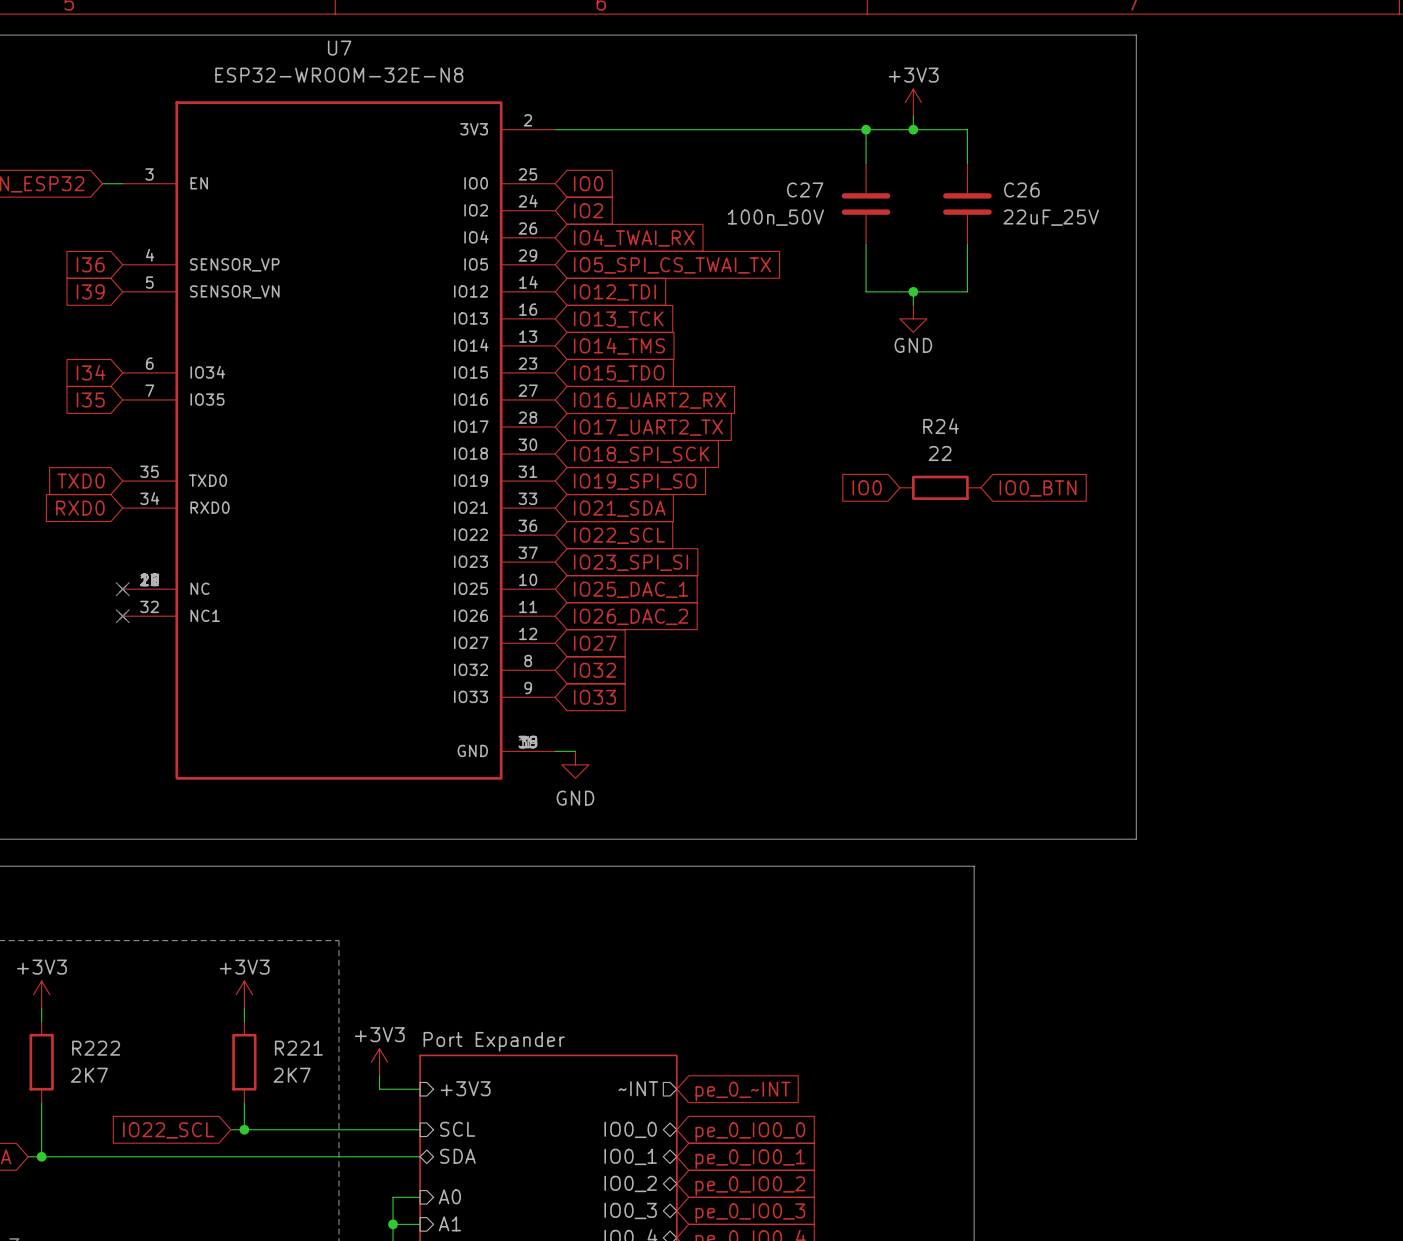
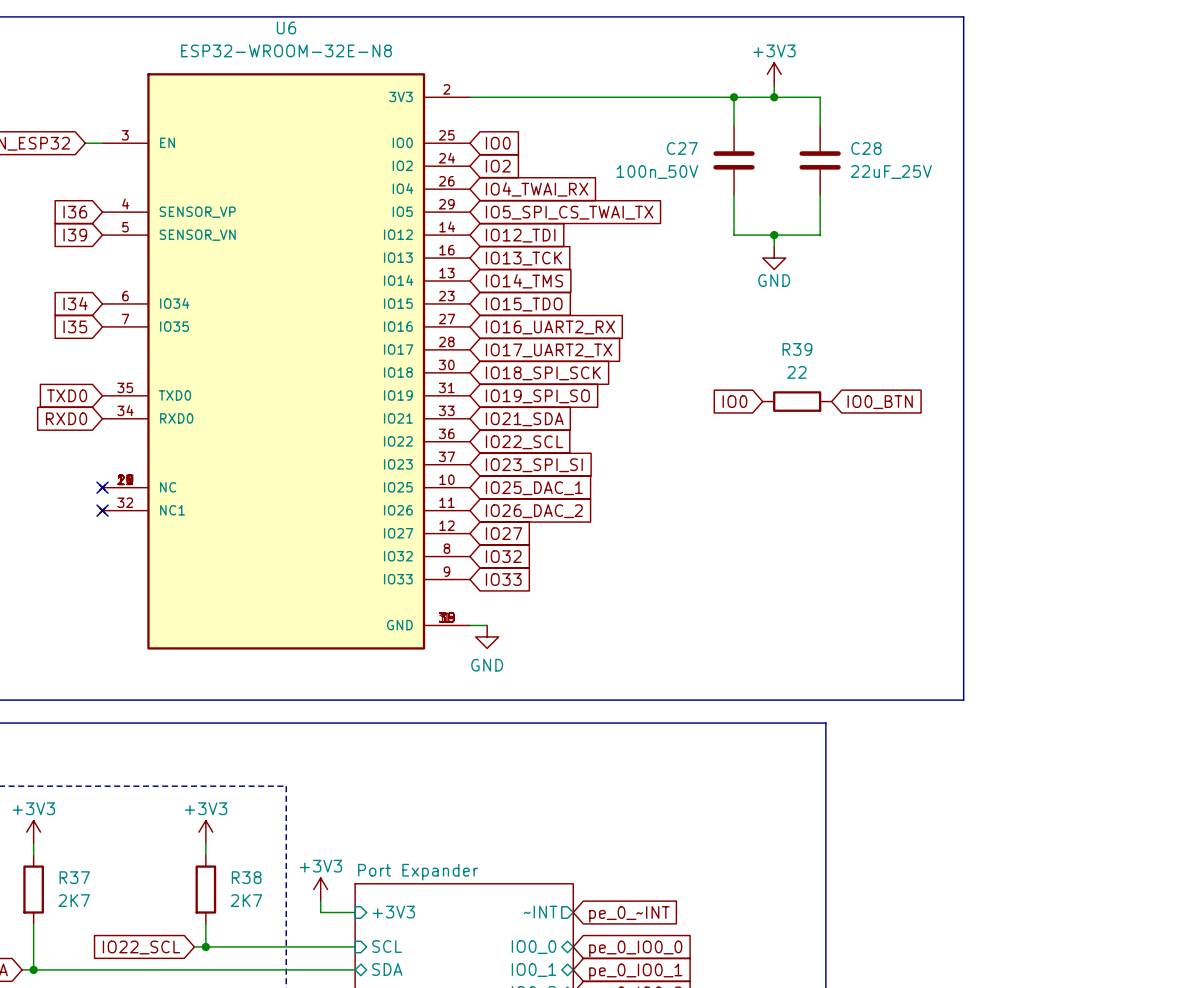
U7 name: U7 (339, 48) -> U6 (286, 27)
C26 name: C26 (1021, 189) -> C28 (866, 148)
R24 name: R24 (941, 426) -> R39 (797, 349)
R222 name: R222 (96, 1048) -> R37 (74, 877)
R221 name: R221 (298, 1048) -> R38 (246, 877)

